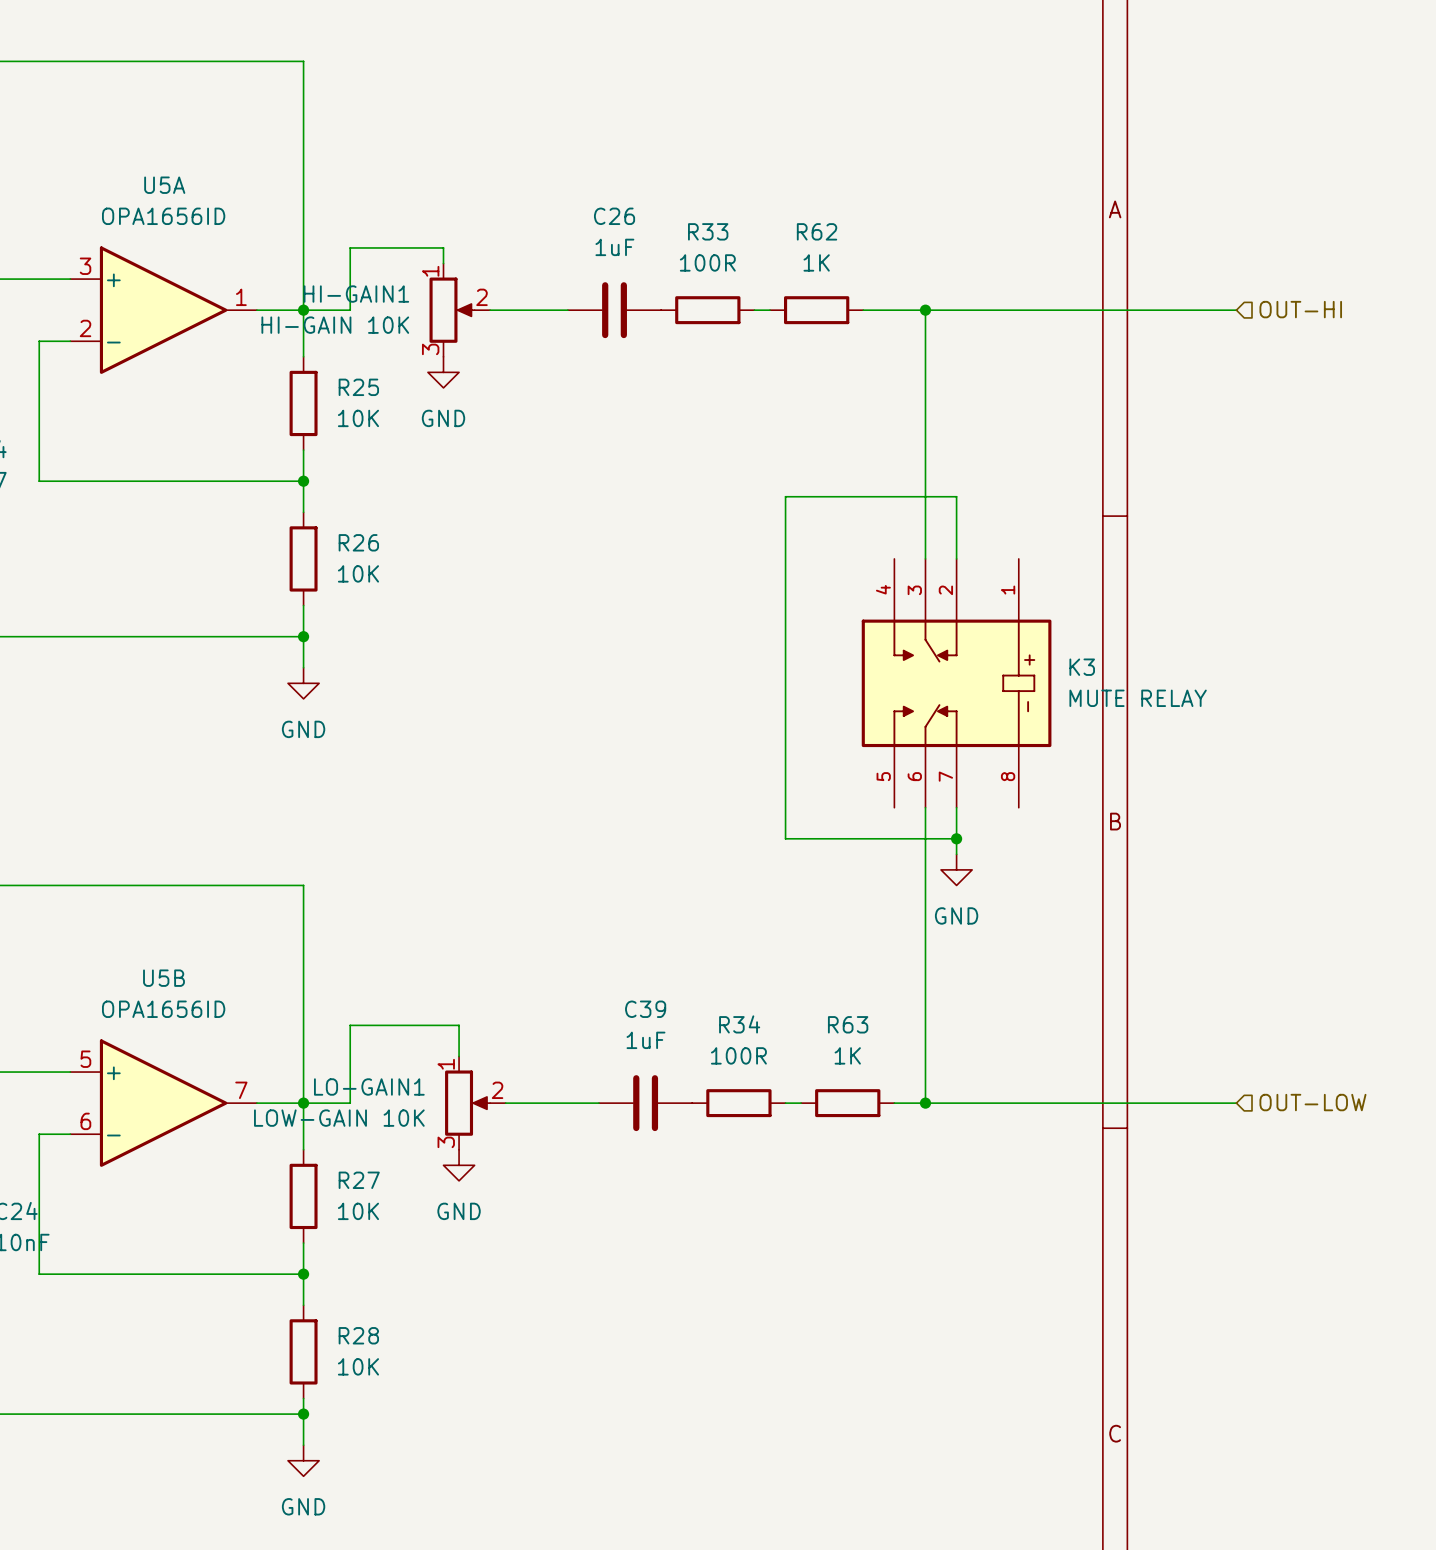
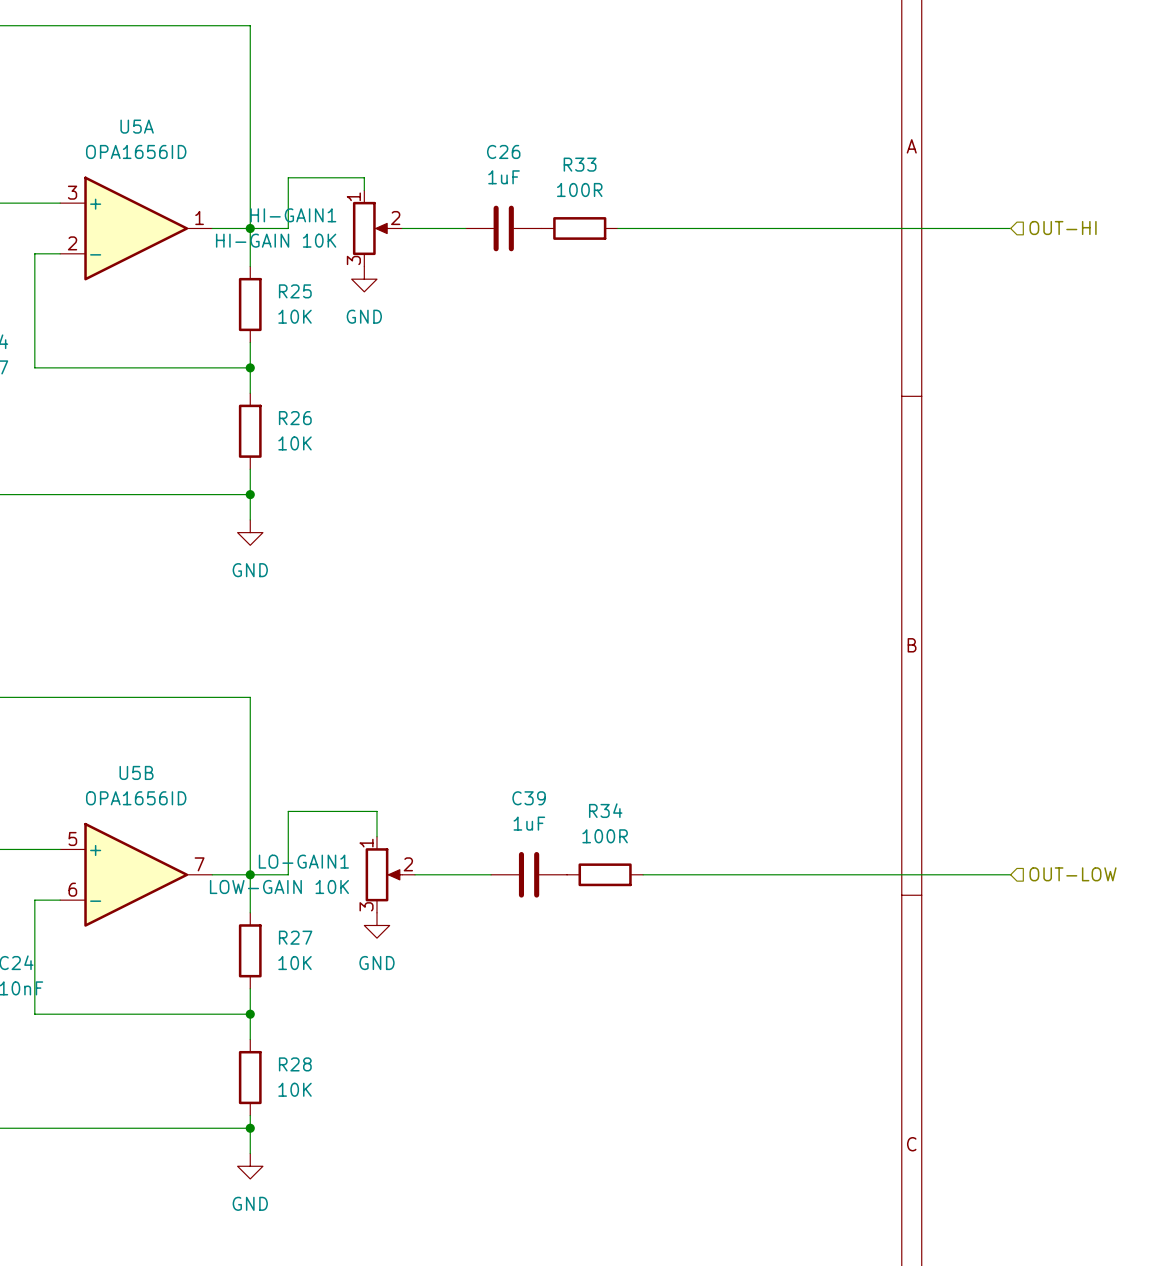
wire: none -> (630, 228) (706, 228)
R62: 1K (816, 310) -> none
wire: (925, 310) (925, 558) -> none
junction: (925, 310) -> none
wire: (956, 558) (956, 496) (785, 496) (785, 838) (956, 838) -> none
K3: MUTE RELAY (956, 683) -> none
wire: (925, 807) (925, 1103) -> none
wire: (956, 807) (956, 854) -> none
junction: (956, 838) -> none
power symbol: GND (956, 869) -> none
wire: none -> (655, 874) (731, 874)
R63: 1K (847, 1103) -> none
junction: (925, 1103) -> none

